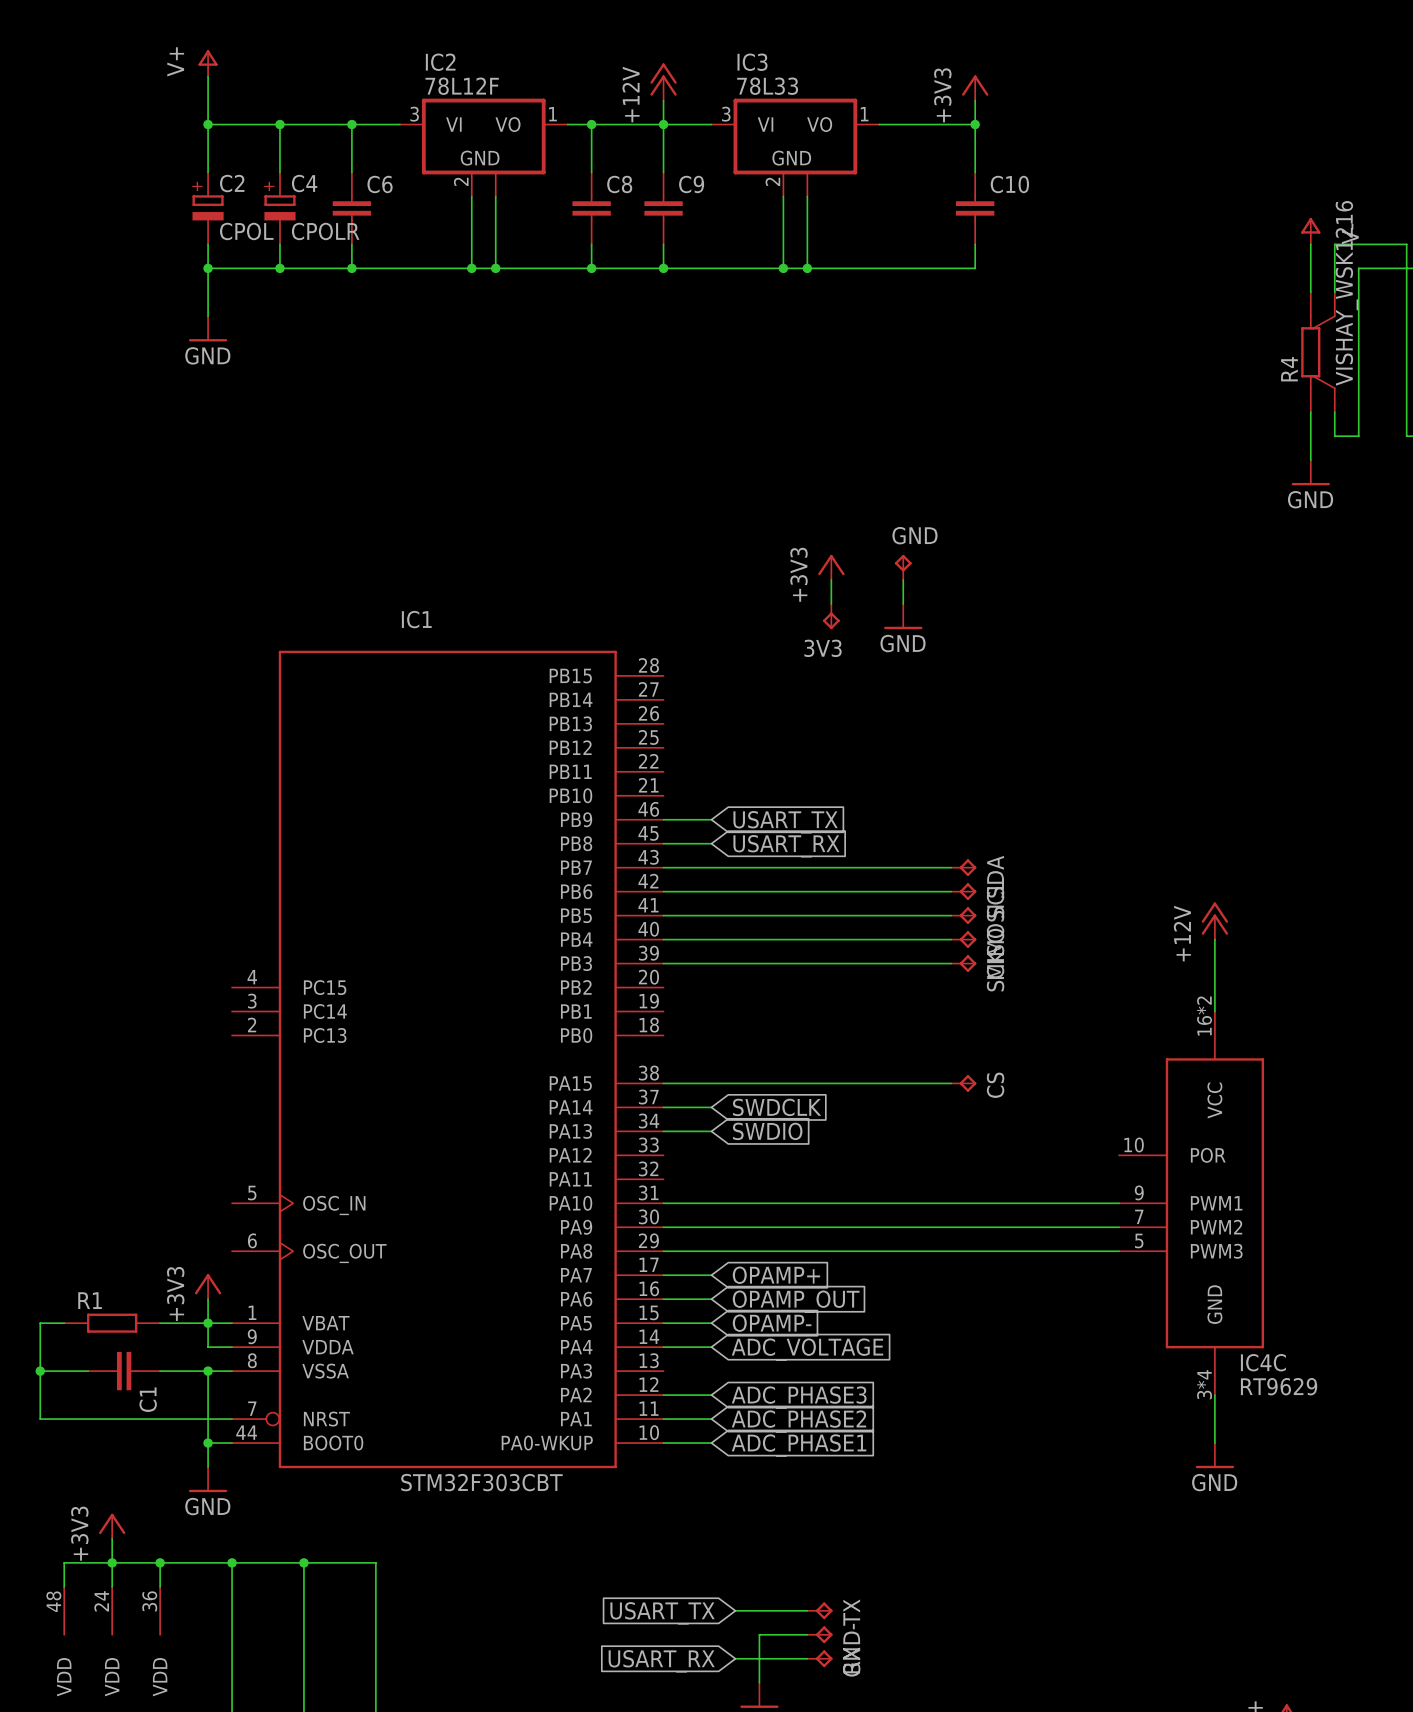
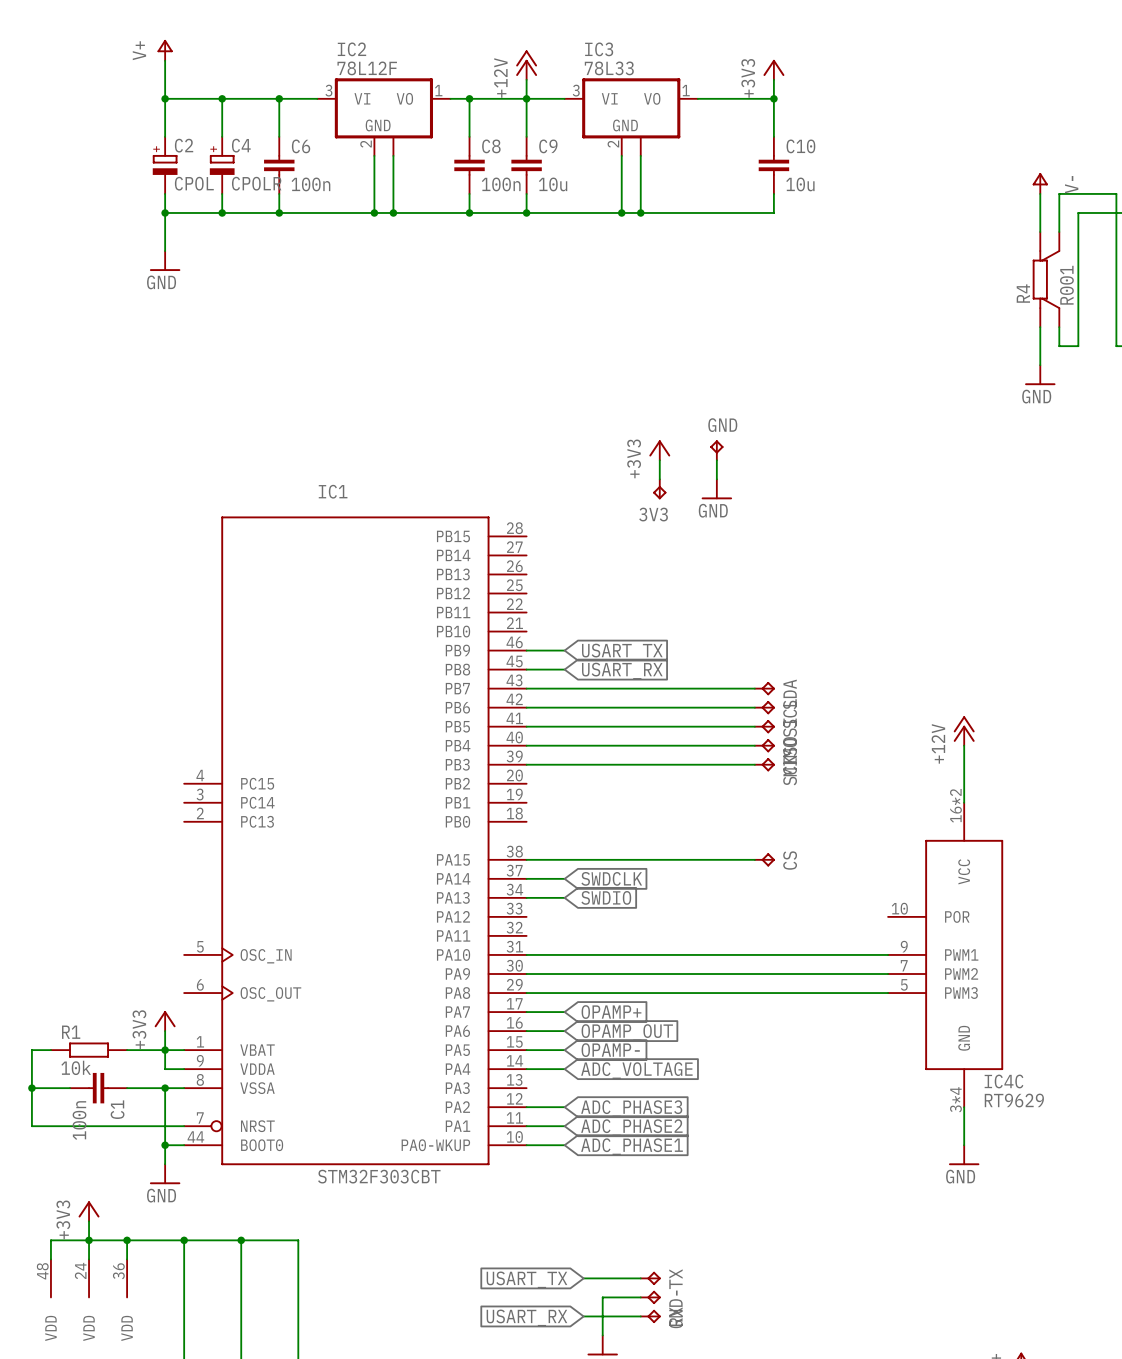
C6 value: none -> 100n (310, 184)
C8 value: none -> 100n (501, 184)
C9 value: none -> 10u (553, 184)
C10 value: none -> 10u (800, 184)
R4 value: VISHAY_WSK1216 (1346, 293) -> R001 (1066, 285)
R1 value: none -> 10k (76, 1067)
C1 value: none -> 100n (79, 1120)

